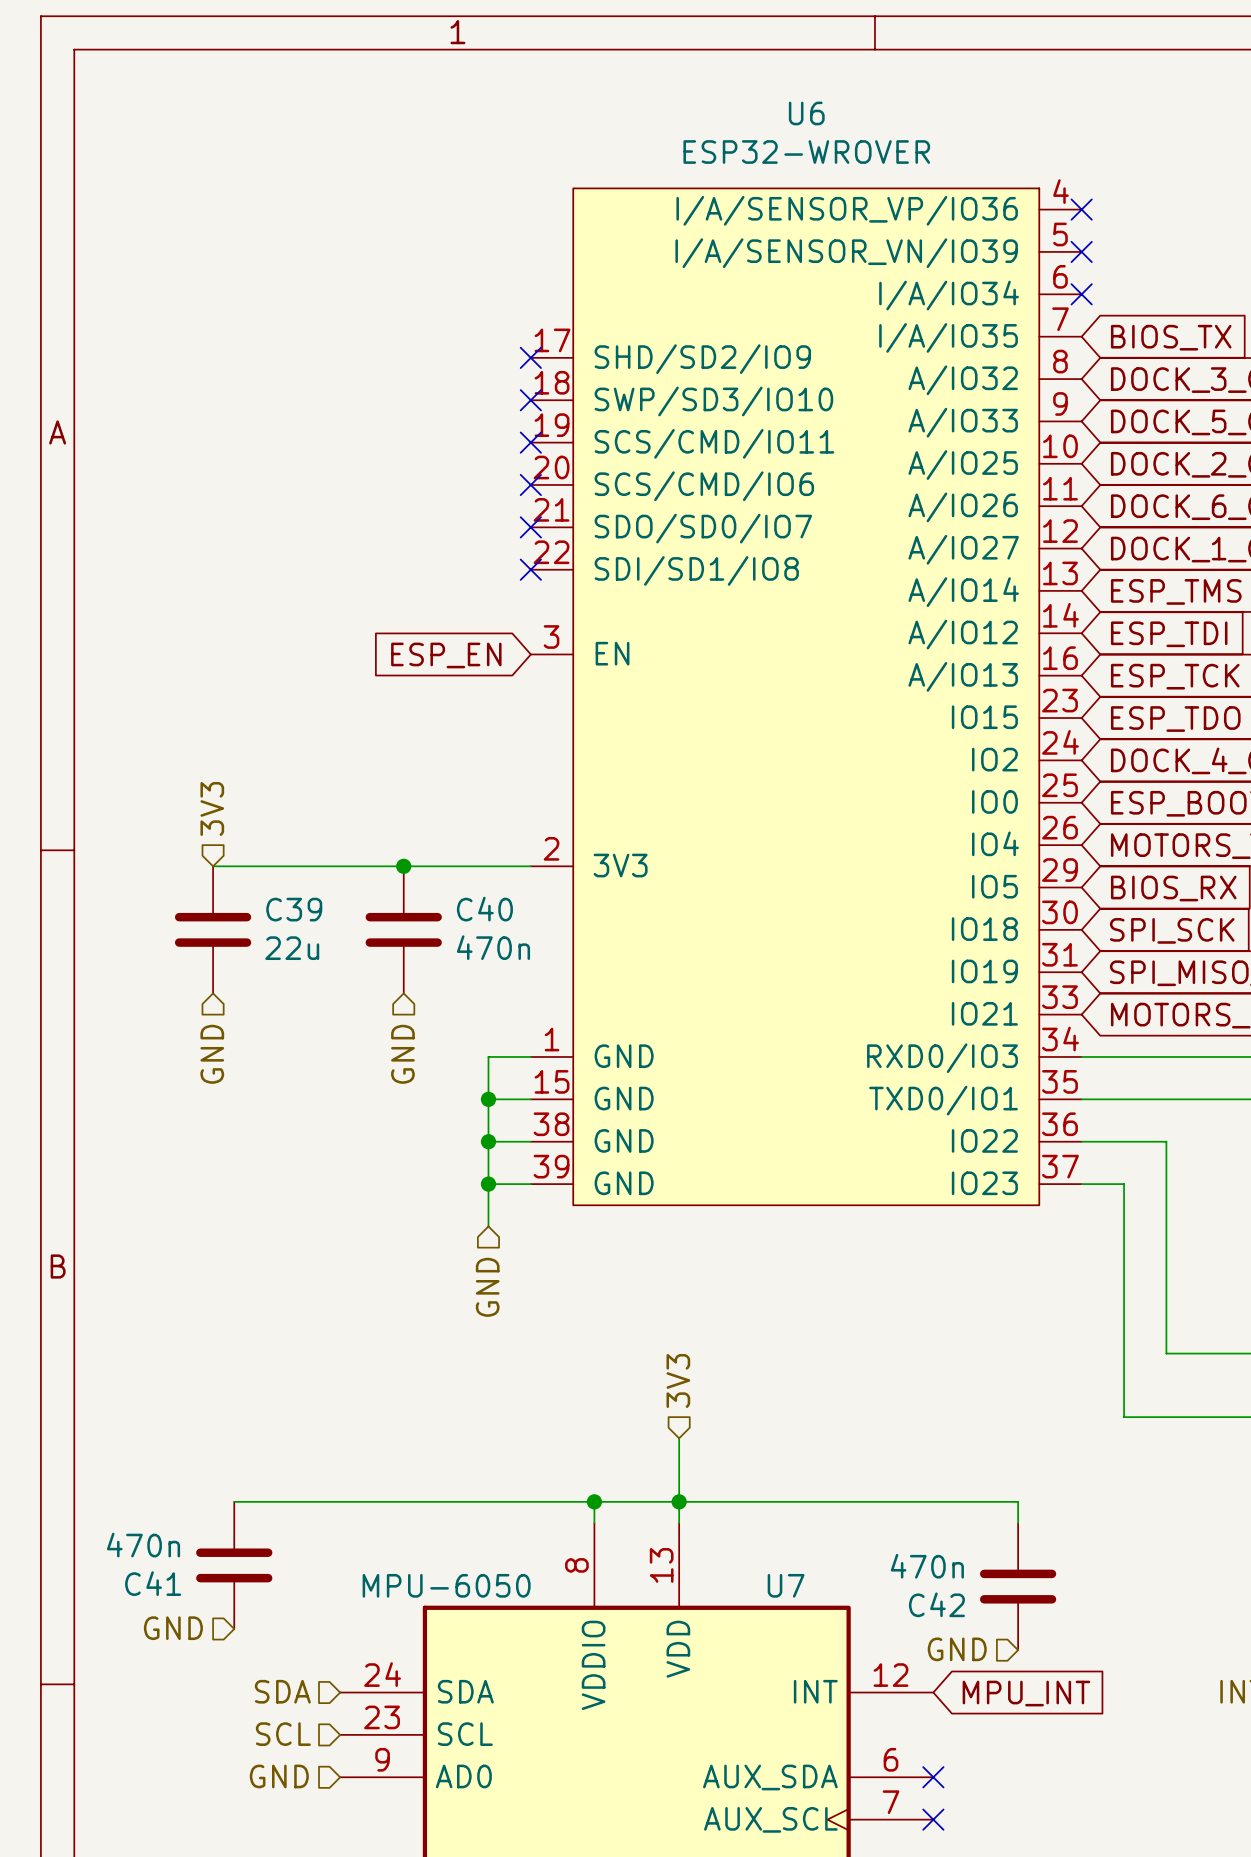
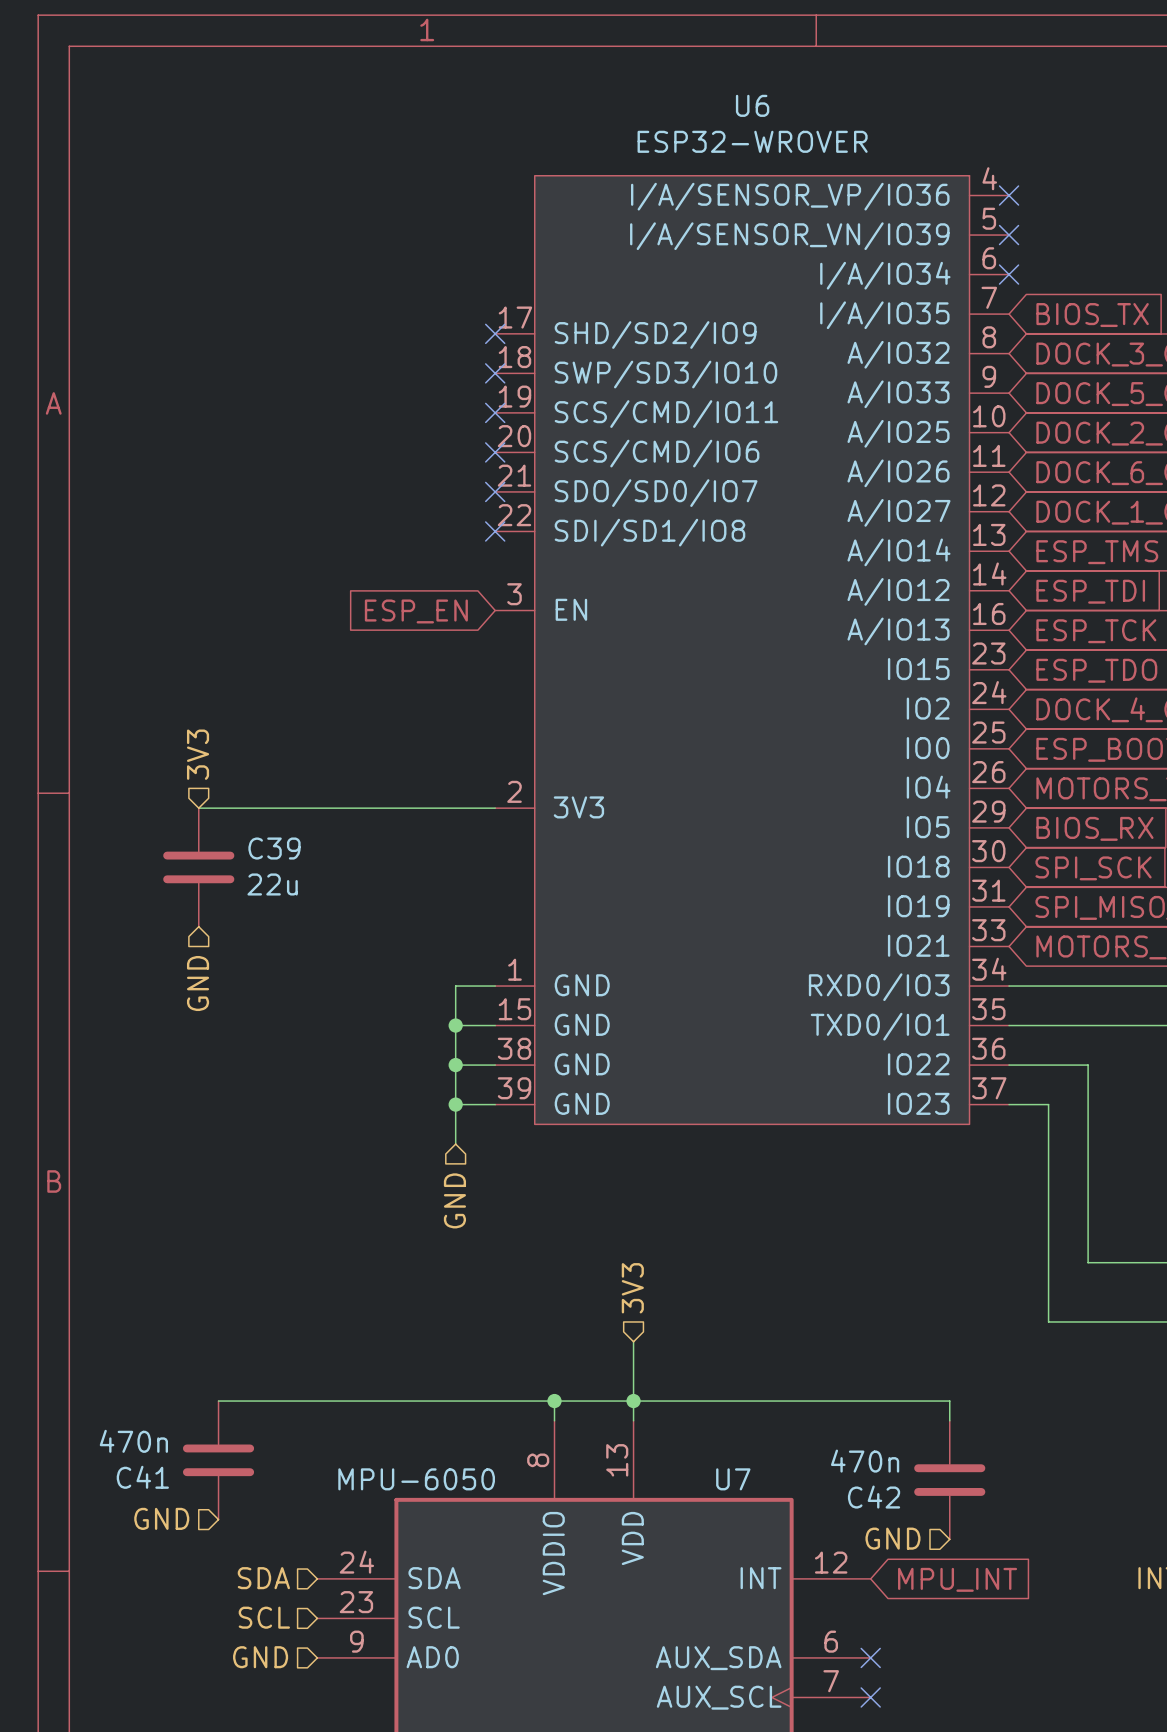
junction: (403, 866) -> none
C40: 470n (403, 929) -> none
hierarchical label: GND (402, 1054) -> none

